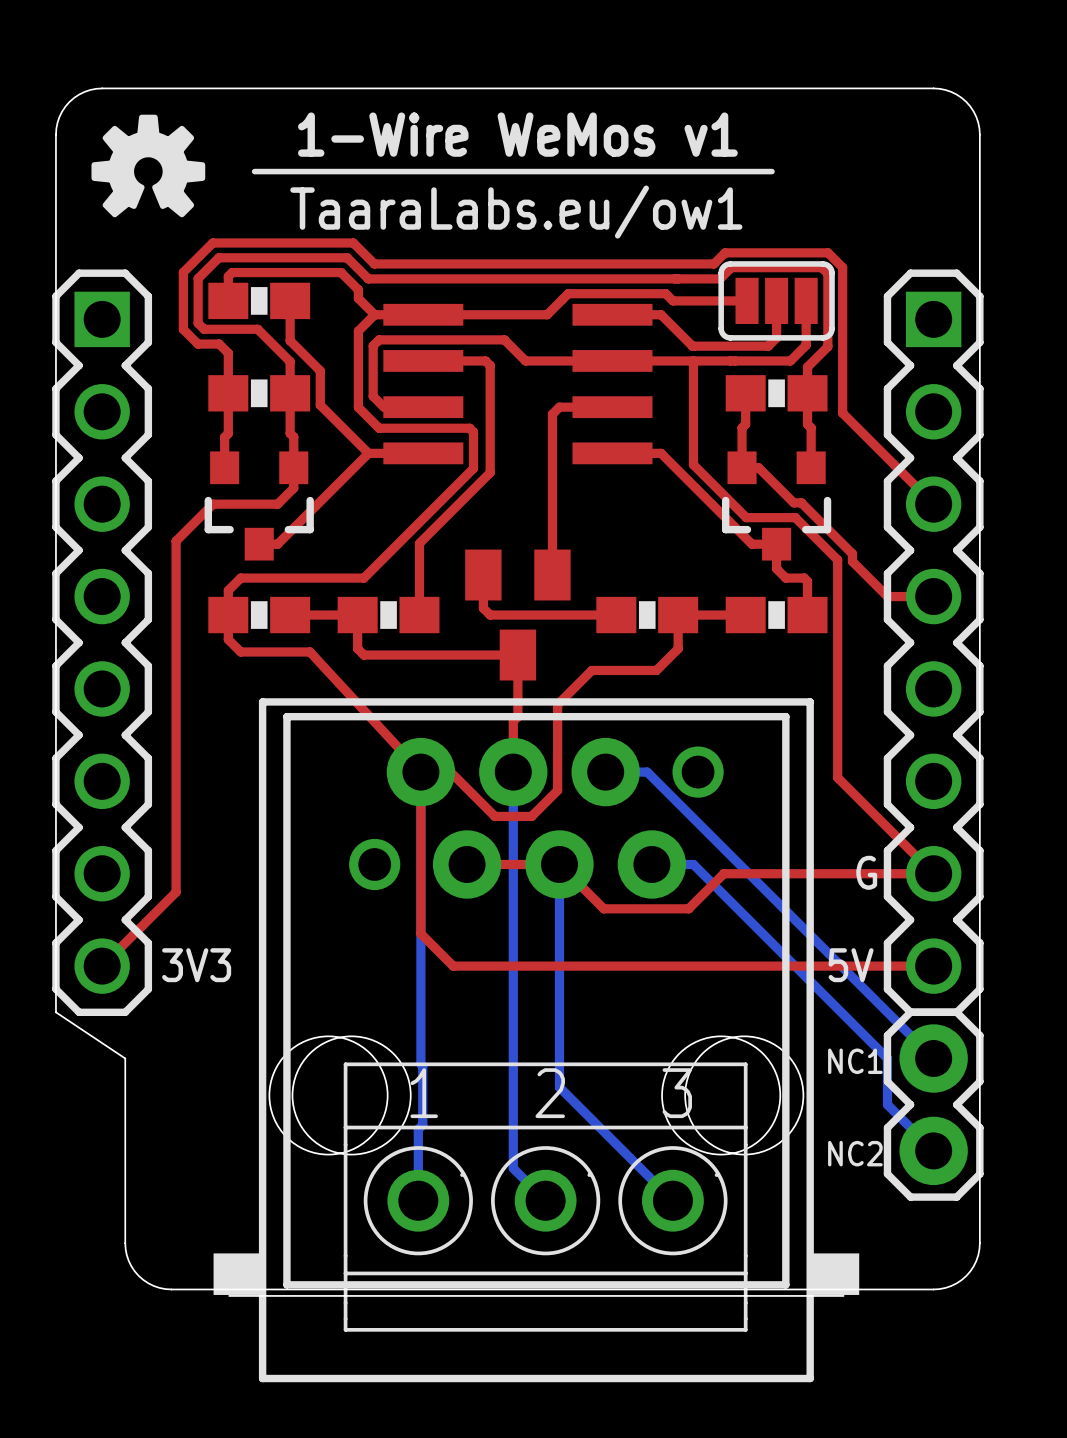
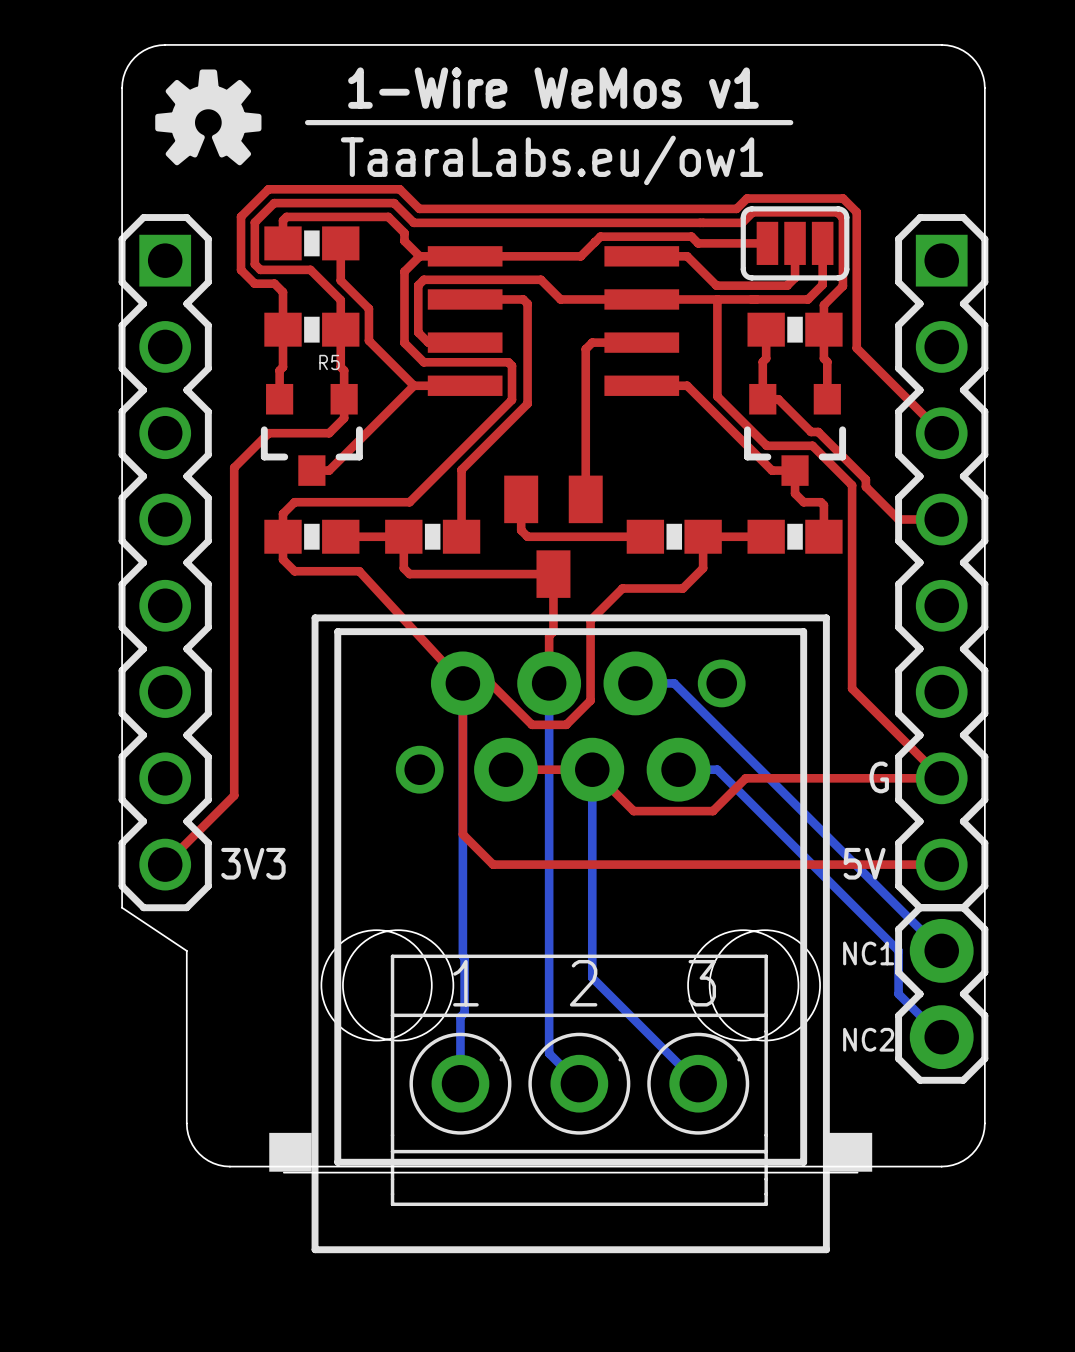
R5 name: none -> R5 (329, 362)

